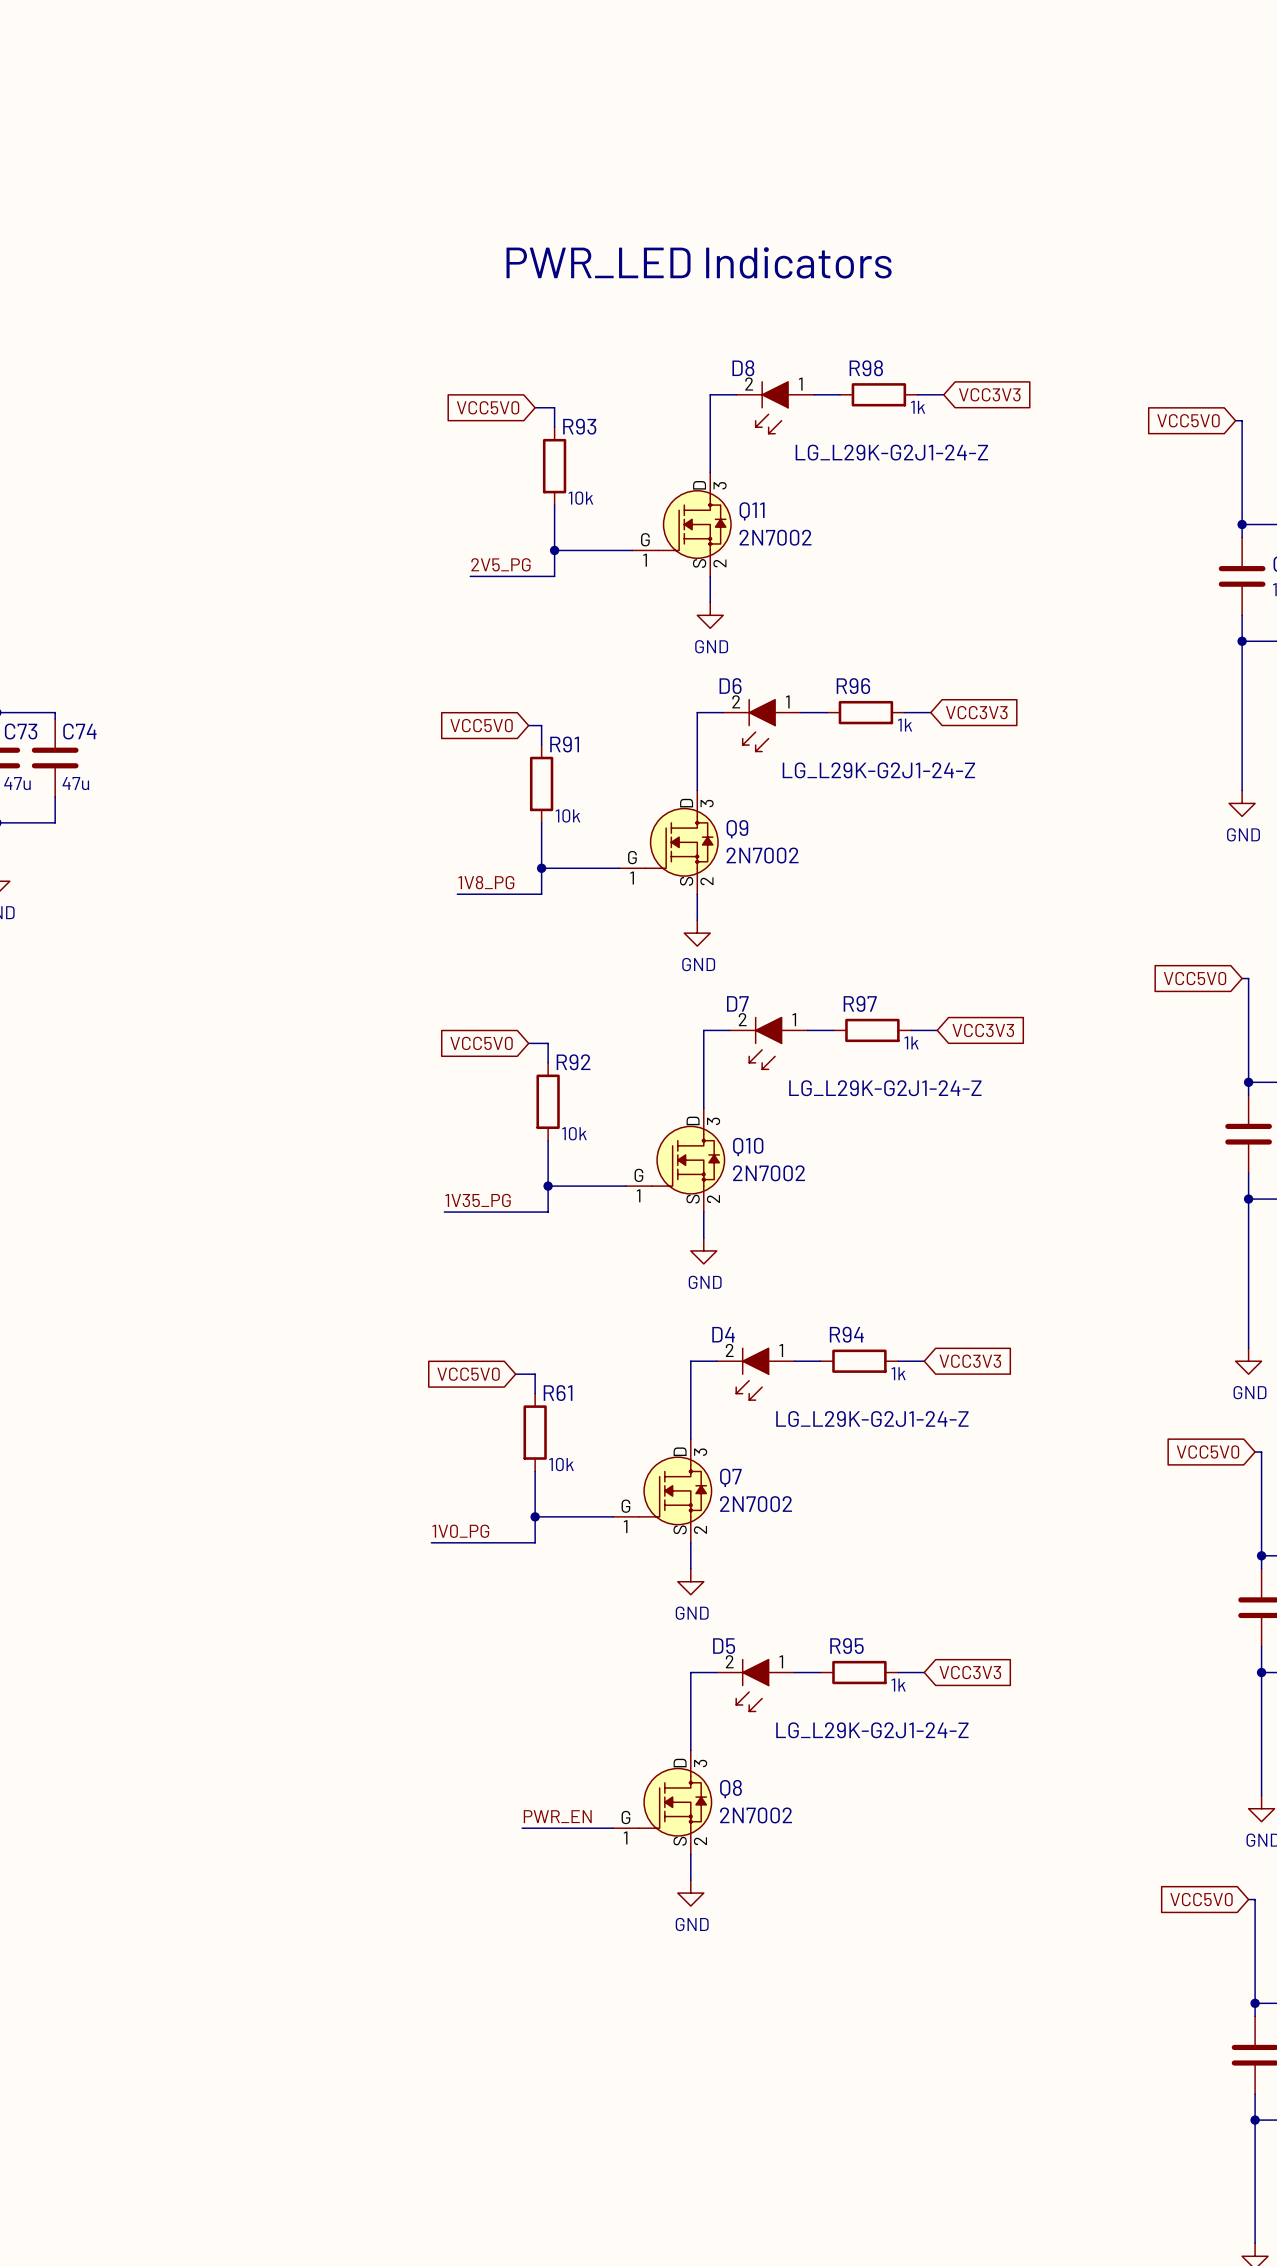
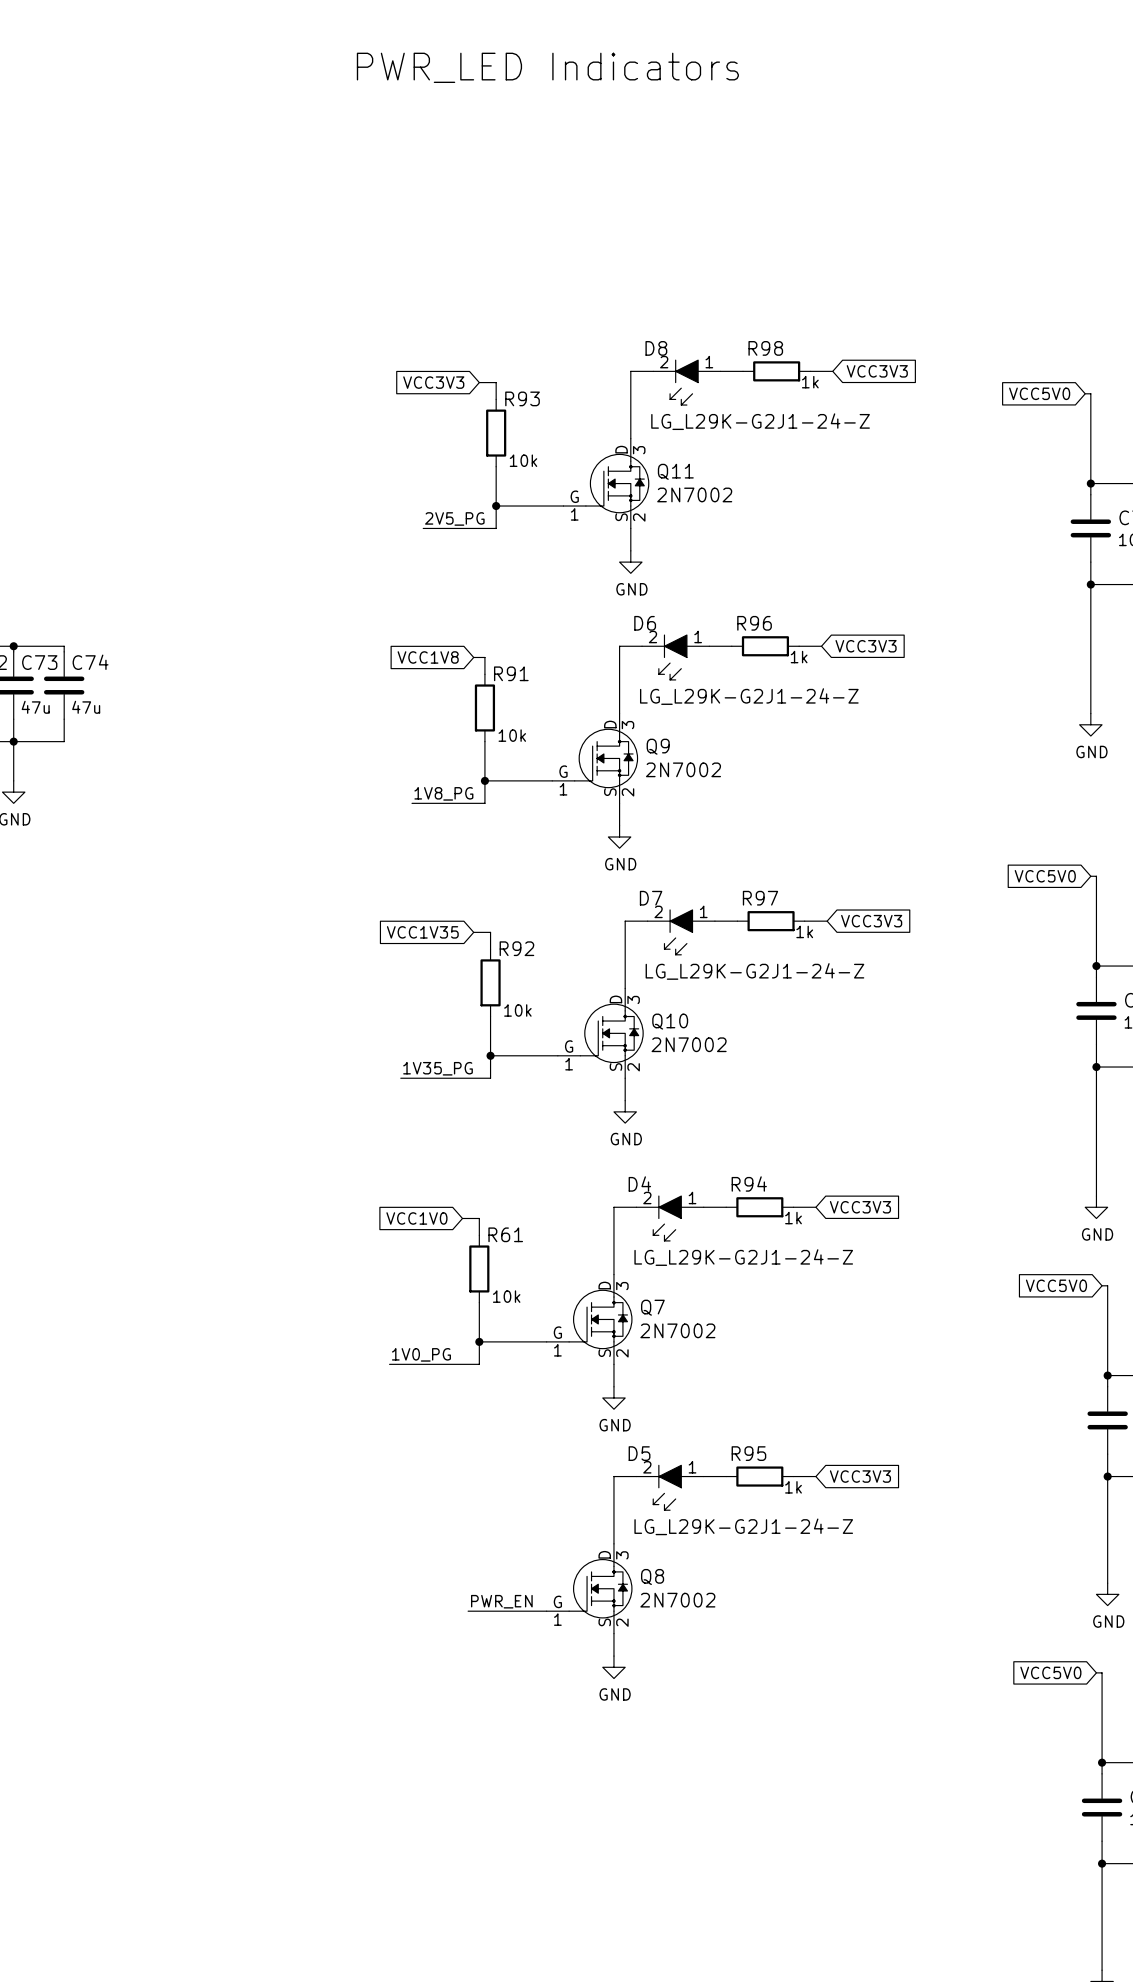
text position: PWR_LED Indicators (699, 262) -> PWR_LED Indicators (547, 67)
global label: VCC5V0 (488, 407) -> VCC3V3 (433, 382)
global label: VCC5V0 (481, 725) -> VCC1V8 (428, 657)
global label: VCC5V0 (481, 1043) -> VCC1V35 (422, 932)
global label: VCC5V0 (468, 1374) -> VCC1V0 (416, 1218)

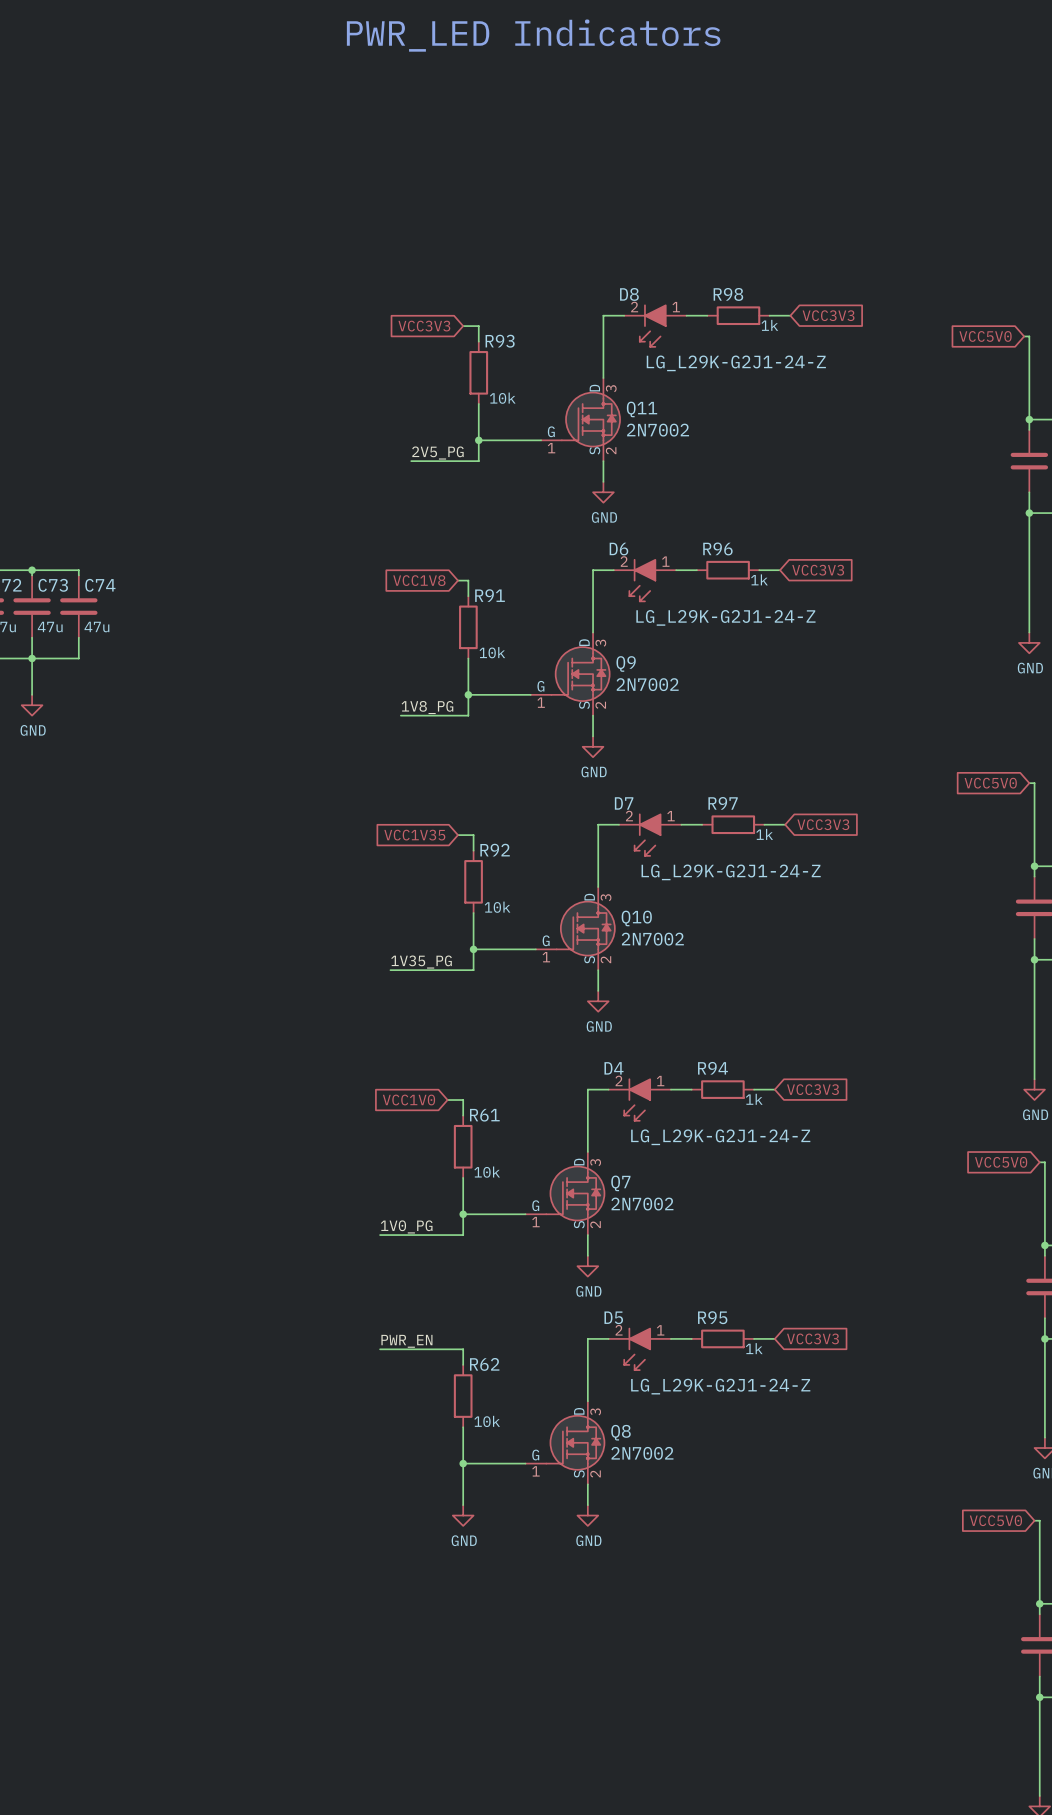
wire: none -> (380, 1349) (463, 1349) (463, 1364)
R62: none -> (463, 1396)
wire: none -> (463, 1427) (463, 1505)
label position: PWR_EN (501, 1601) -> PWR_EN (406, 1341)
wire: (468, 1611) (479, 1611) -> none
junction: none -> (463, 1463)
power symbol: none -> GND (463, 1515)

